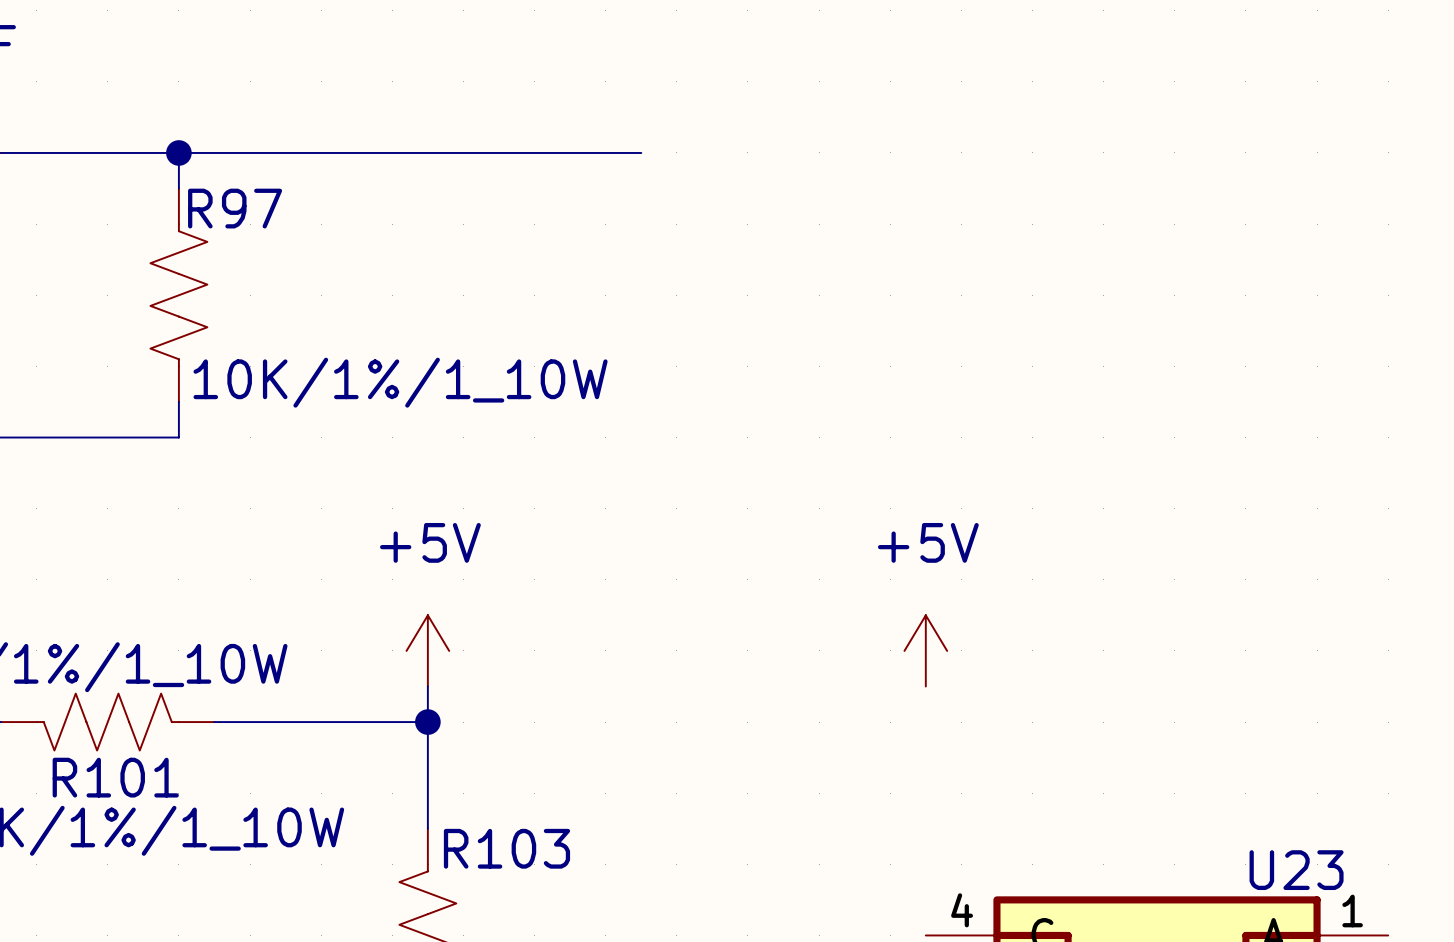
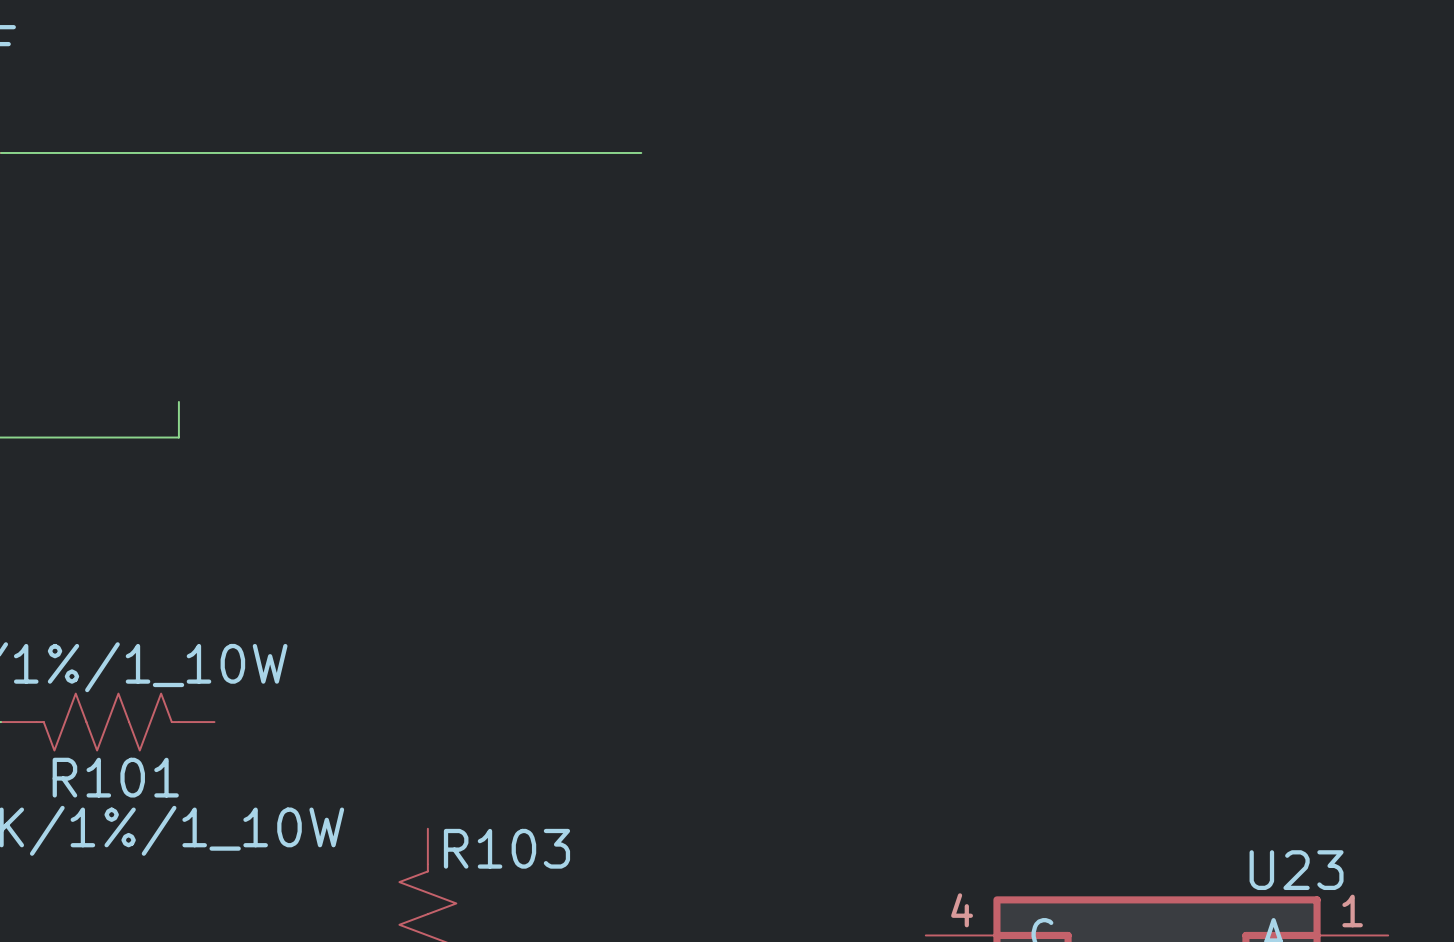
wire: (178, 152) (178, 188) -> none
junction: (178, 152) -> none
R97: 10K/1%/1_10W (178, 295) -> none
power symbol: +5V (427, 650) -> none
power symbol: +5V (925, 650) -> none
wire: (427, 686) (427, 828) -> none
wire: (214, 722) (427, 722) -> none
junction: (427, 722) -> none

